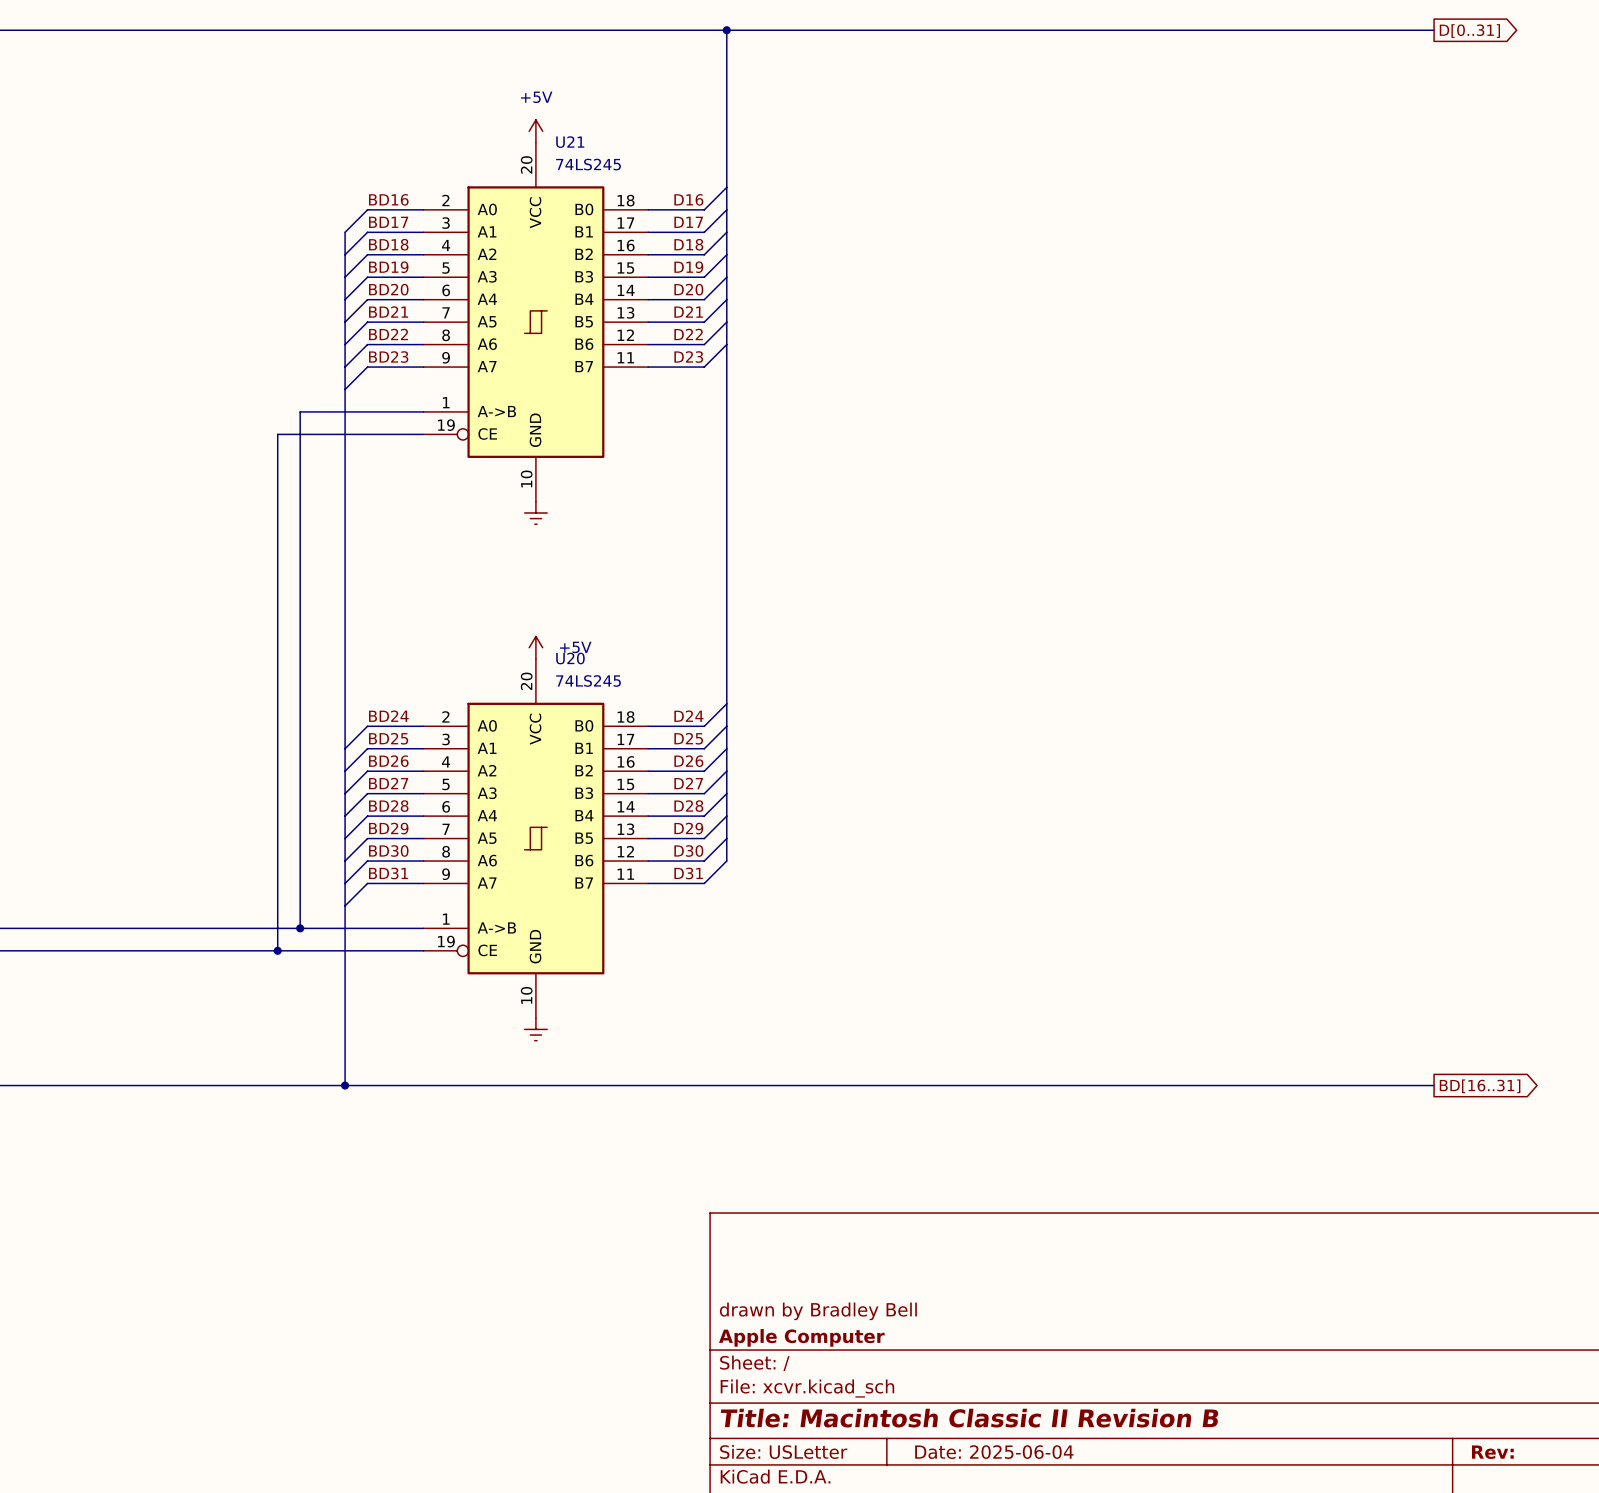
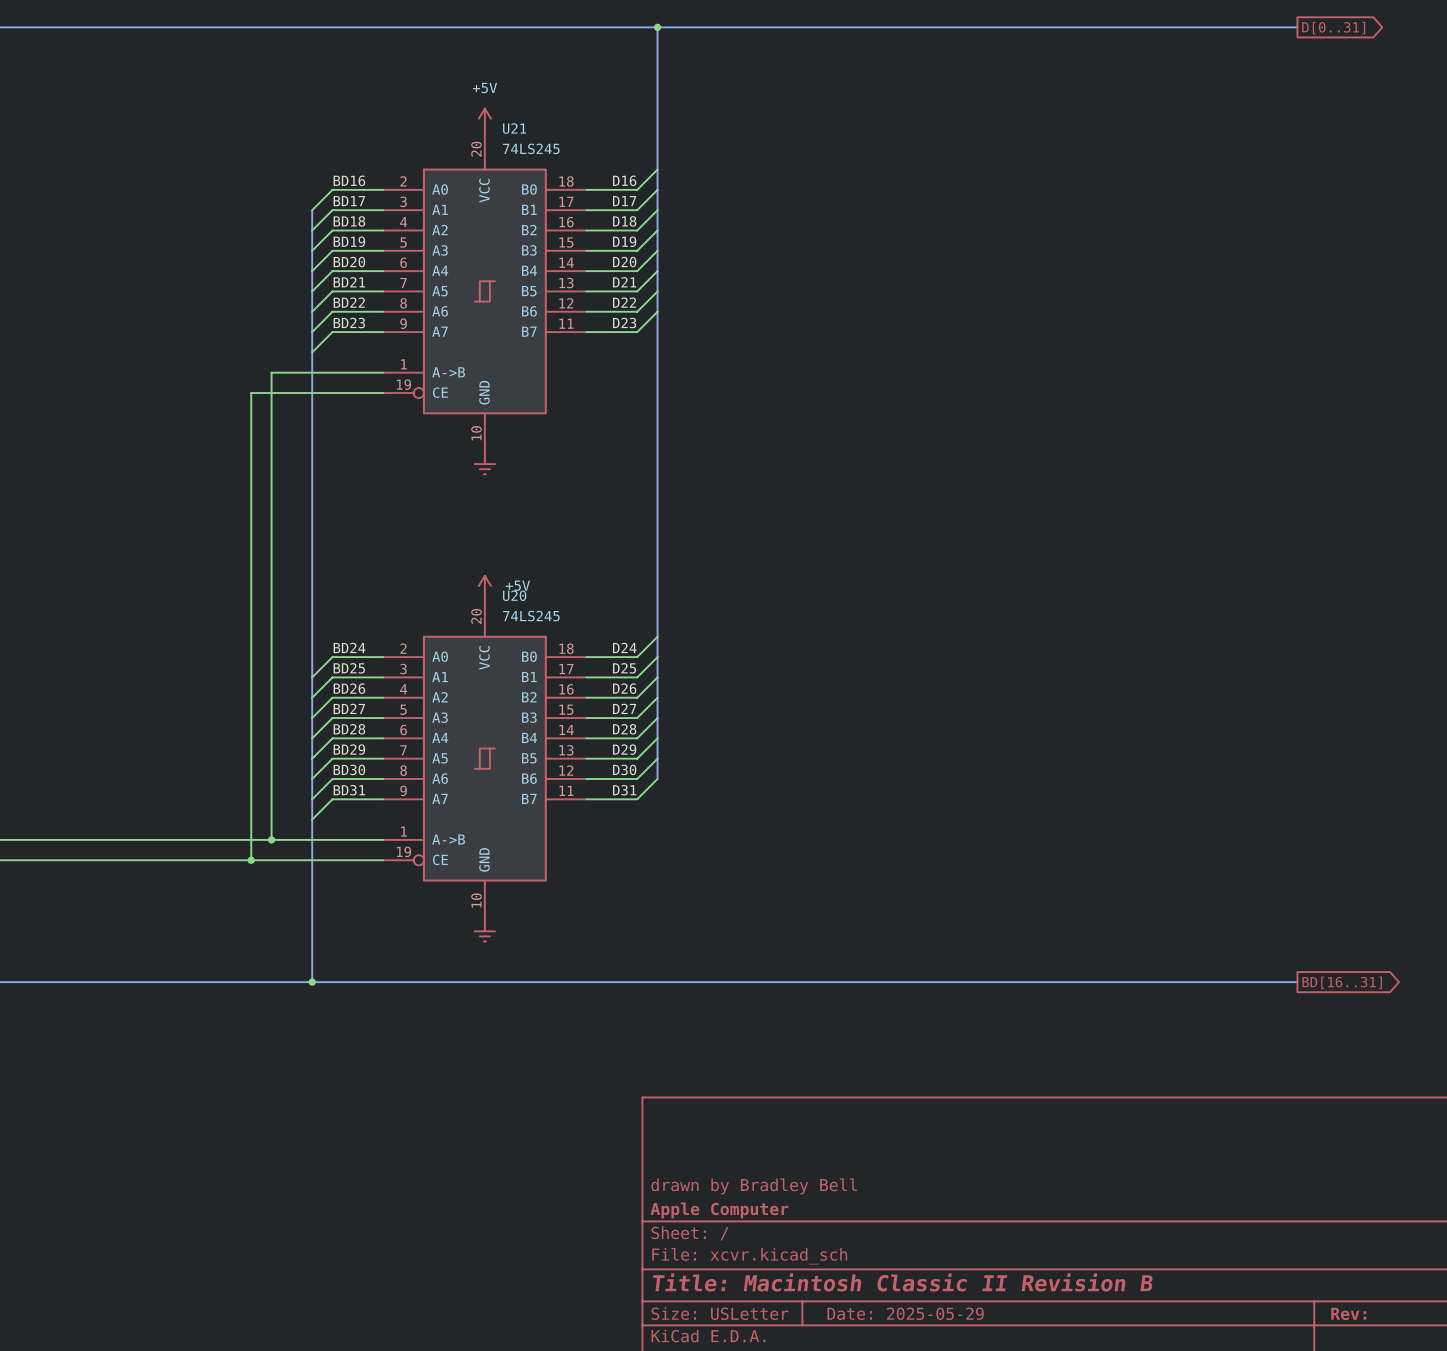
title block: Date: 2025-06-04 (994, 1452) -> Date: 2025-05-29 (905, 1313)

